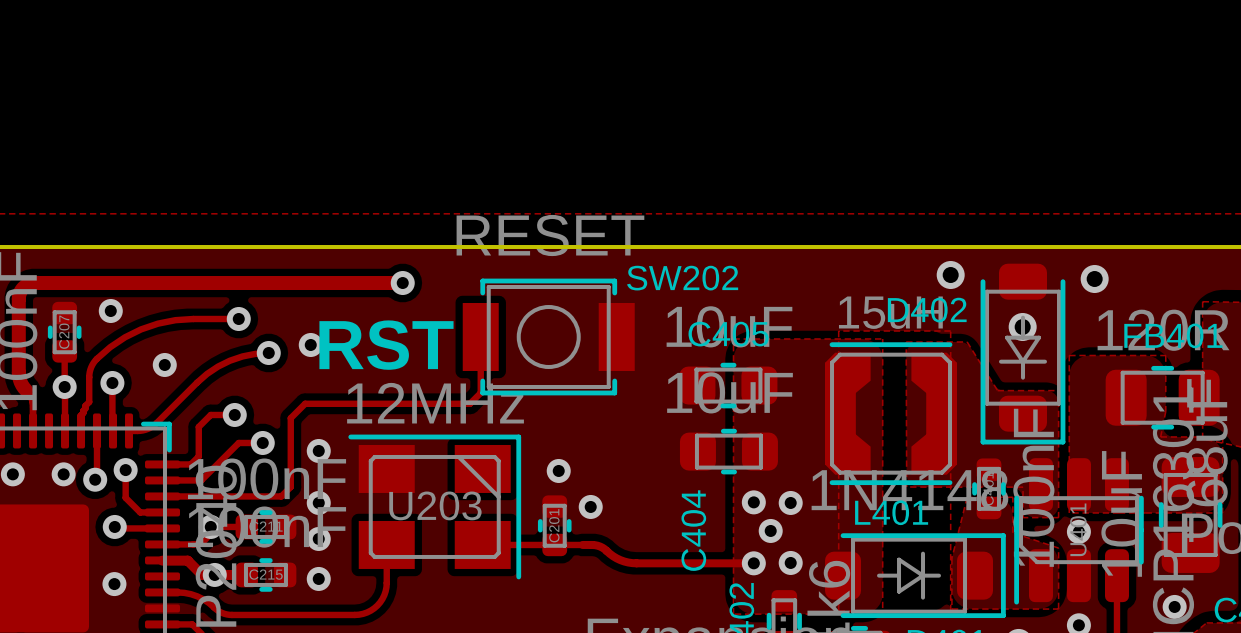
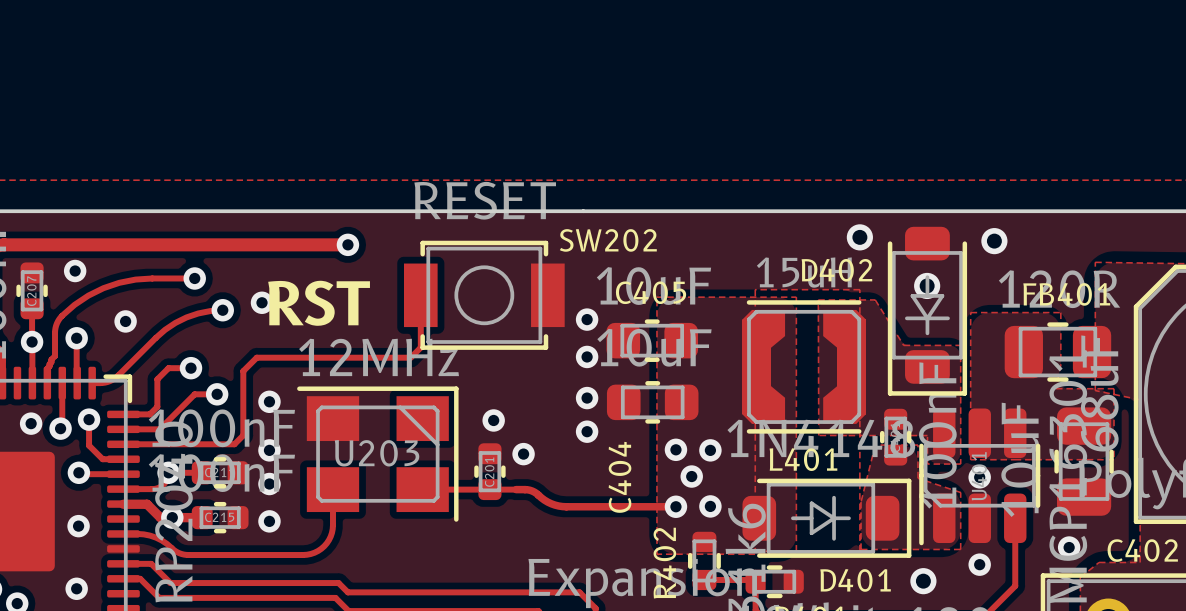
via: none -> (587, 319)
via: none -> (587, 356)
via: none -> (587, 398)
via: none -> (587, 431)

